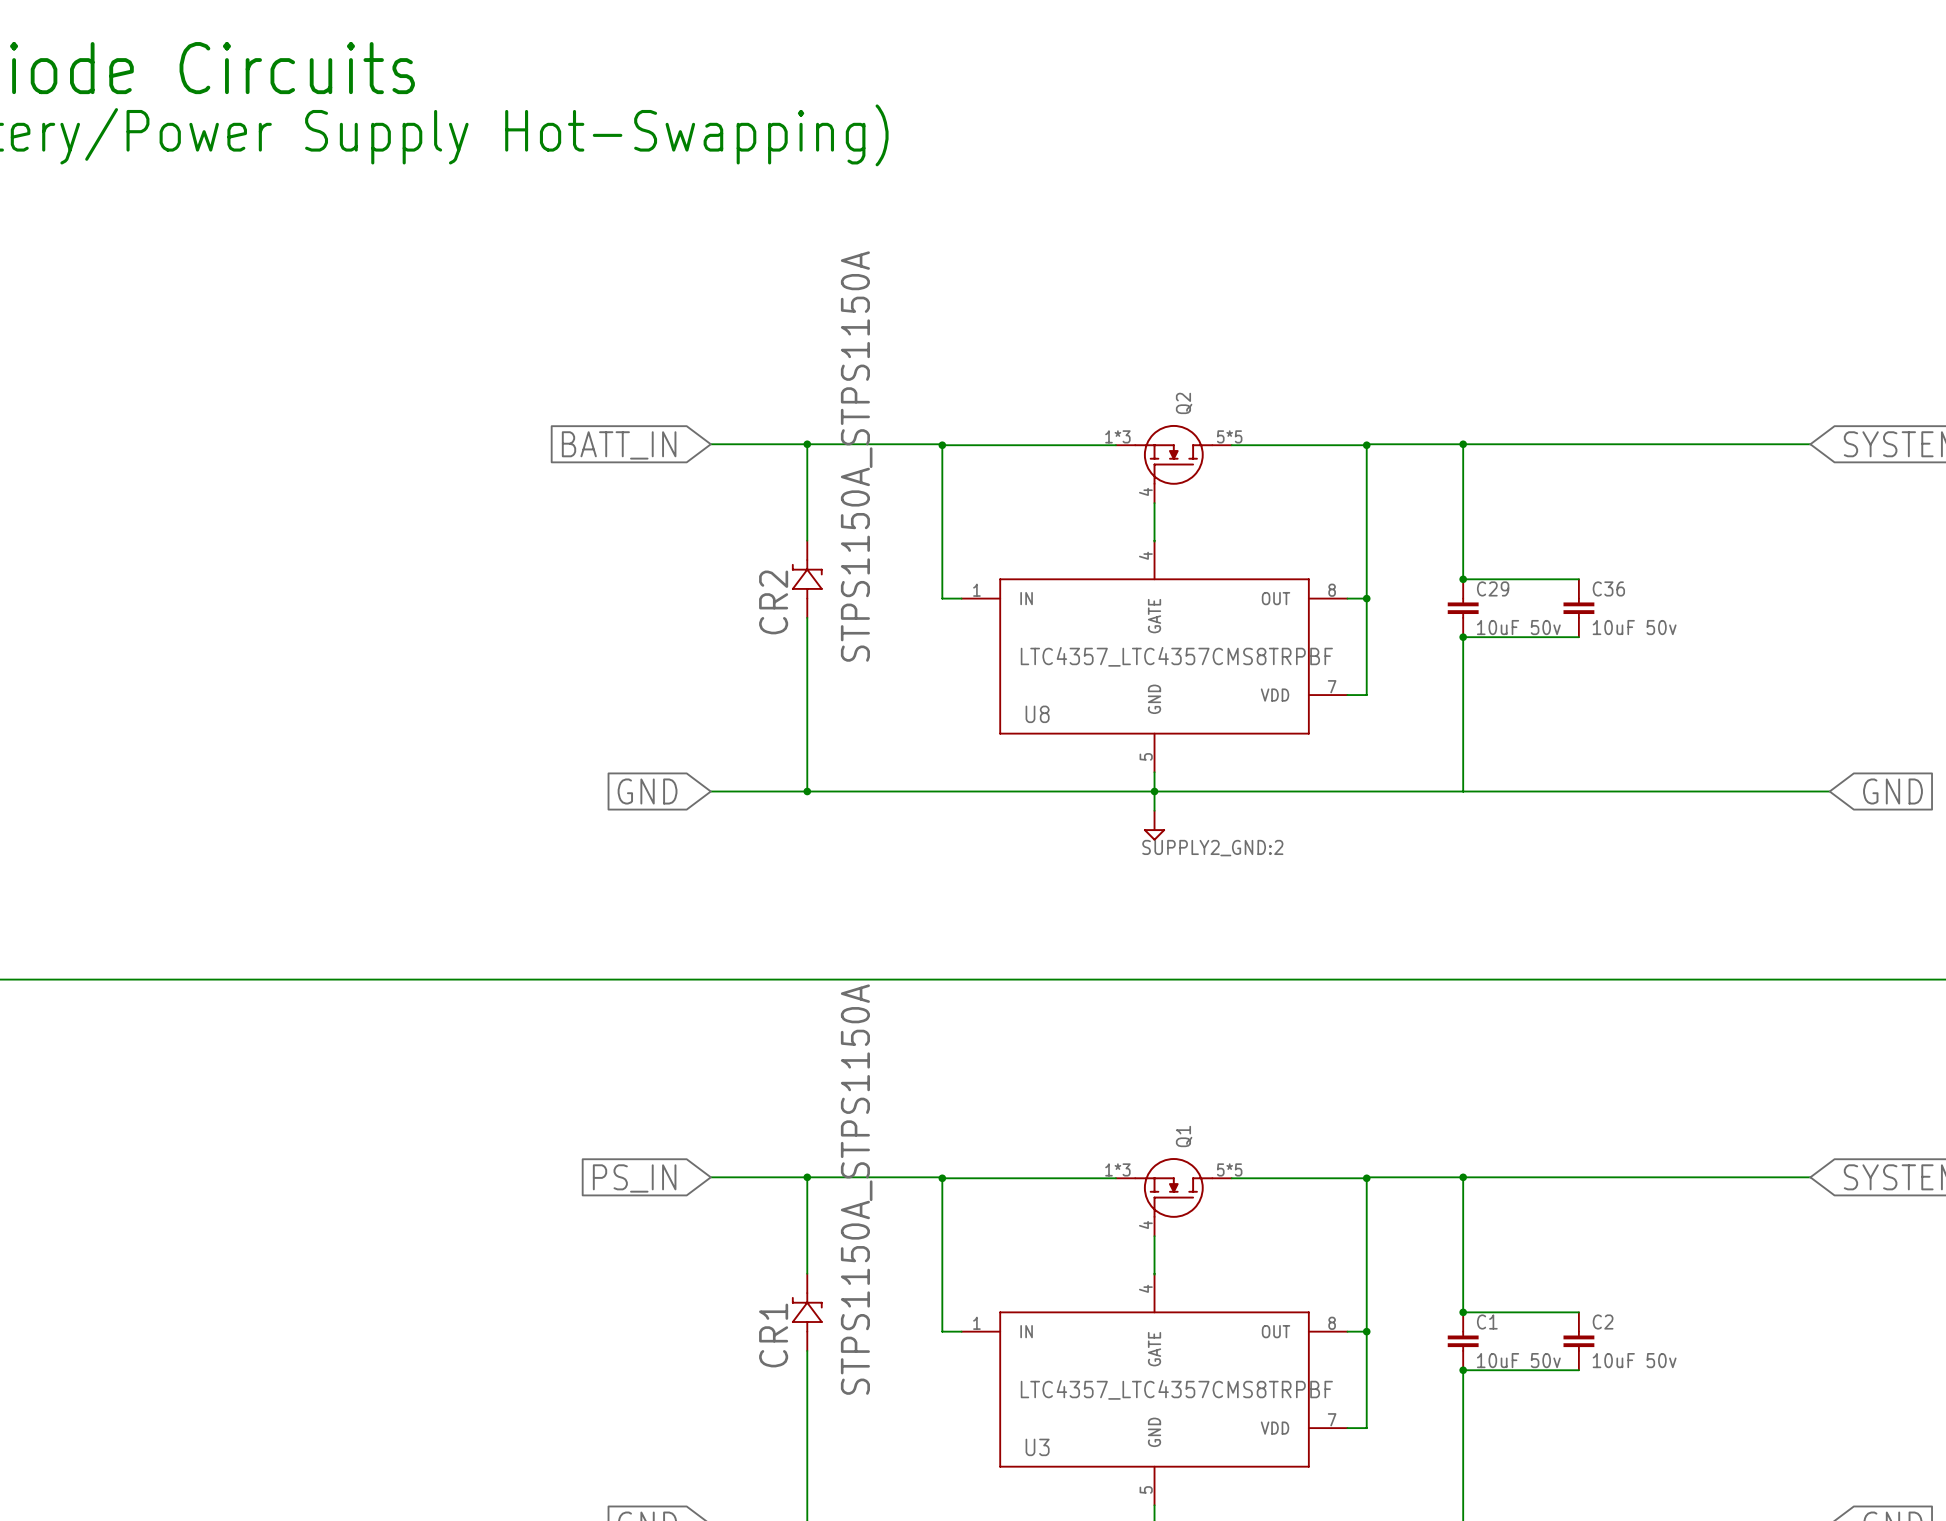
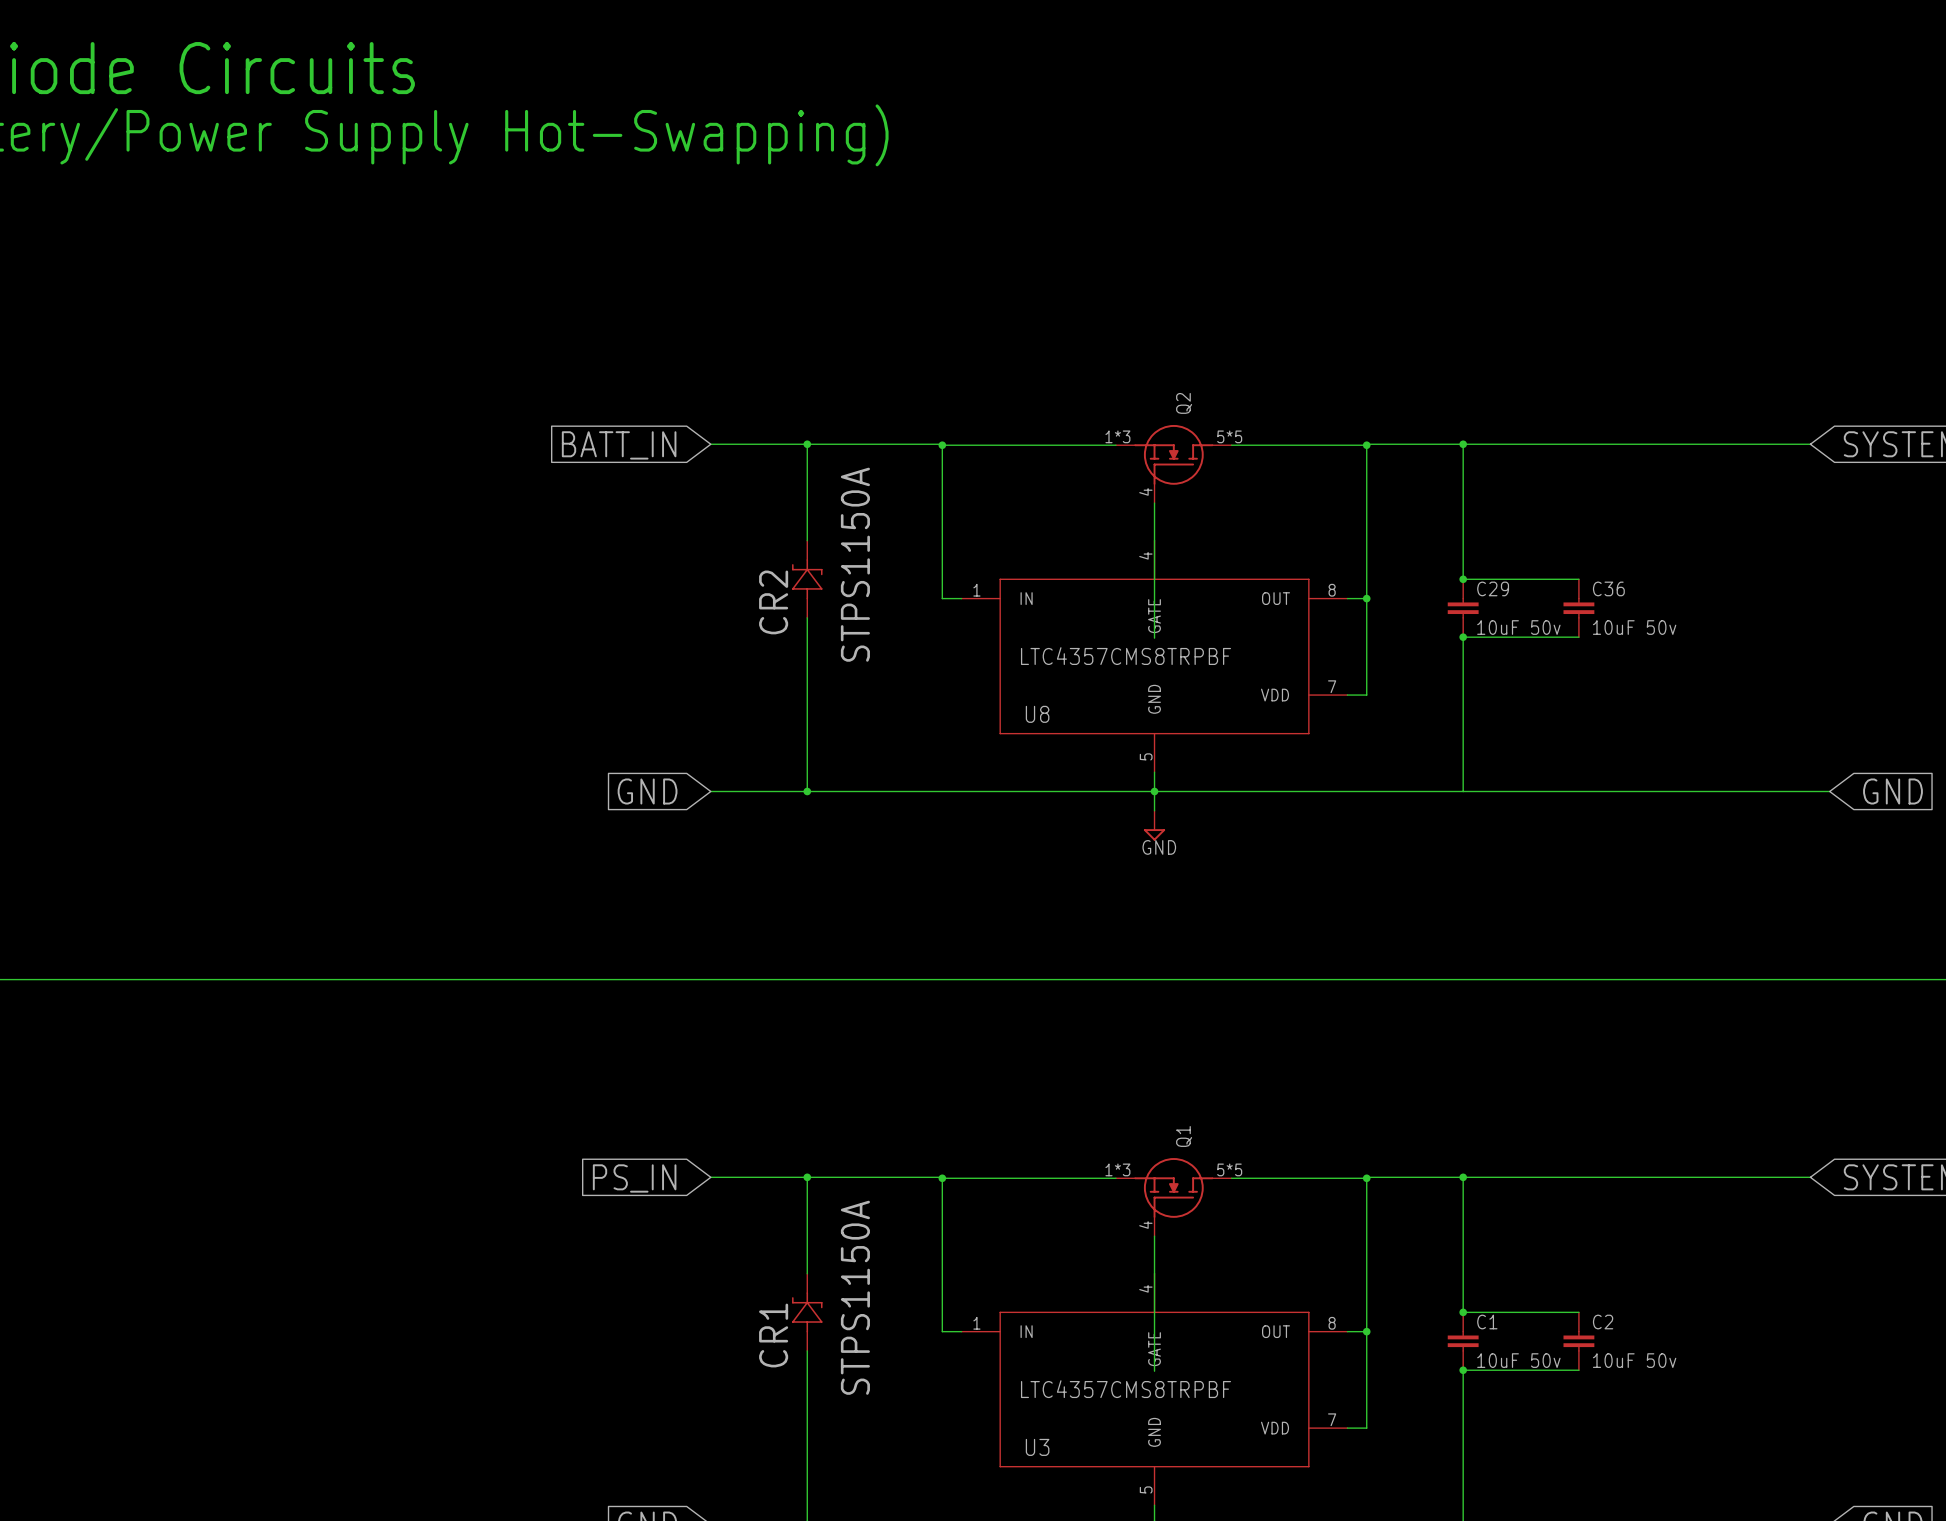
CR2 value: STPS1150A_STPS1150A (856, 456) -> STPS1150A (855, 564)
wire: none -> (1154, 541) (1154, 638)
U8 value: LTC4357_LTC4357CMS8TRPBF (1176, 656) -> LTC4357CMS8TRPBF (1125, 656)
power symbol: SUPPLY2_GND:2 (1154, 825) -> GND (1154, 825)
CR1 value: STPS1150A_STPS1150A (856, 1189) -> STPS1150A (855, 1297)
wire: none -> (1154, 1274) (1154, 1371)
U3 value: LTC4357_LTC4357CMS8TRPBF (1176, 1389) -> LTC4357CMS8TRPBF (1125, 1389)

